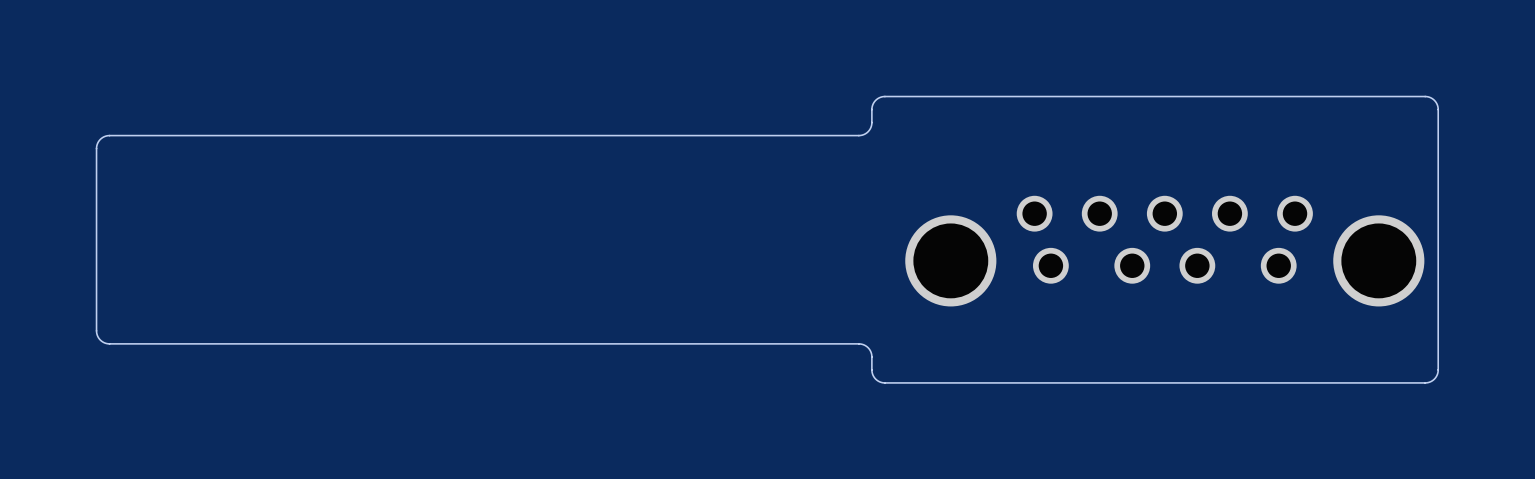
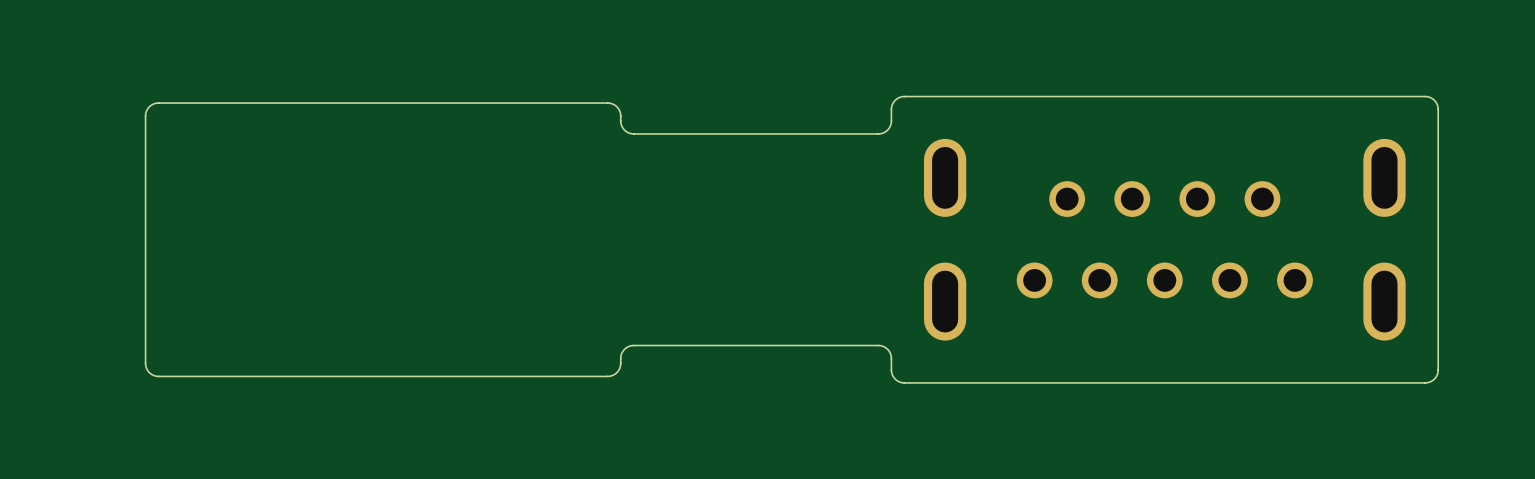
board edge: (904, 96) (883, 96) (876, 99) (872, 106) (870, 129) (865, 133) (858, 135) (109, 135) (100, 139) (96, 148) (96, 330) (98, 337) (105, 343) (858, 343) (865, 345) (870, 351) (872, 372) (876, 380) (883, 382) (904, 382) -> (904, 96) (897, 98) (892, 103) (891, 122) (888, 128) (878, 133) (632, 133) (622, 127) (617, 107) (607, 103) (158, 103) (149, 106) (145, 116) (145, 363) (147, 369) (153, 375) (607, 376) (618, 371) (622, 351) (632, 345) (878, 345) (885, 347) (890, 352) (893, 376) (897, 380) (904, 382)
part footprint: [905, 195, 1425, 307] -> [923, 138, 1406, 341]

